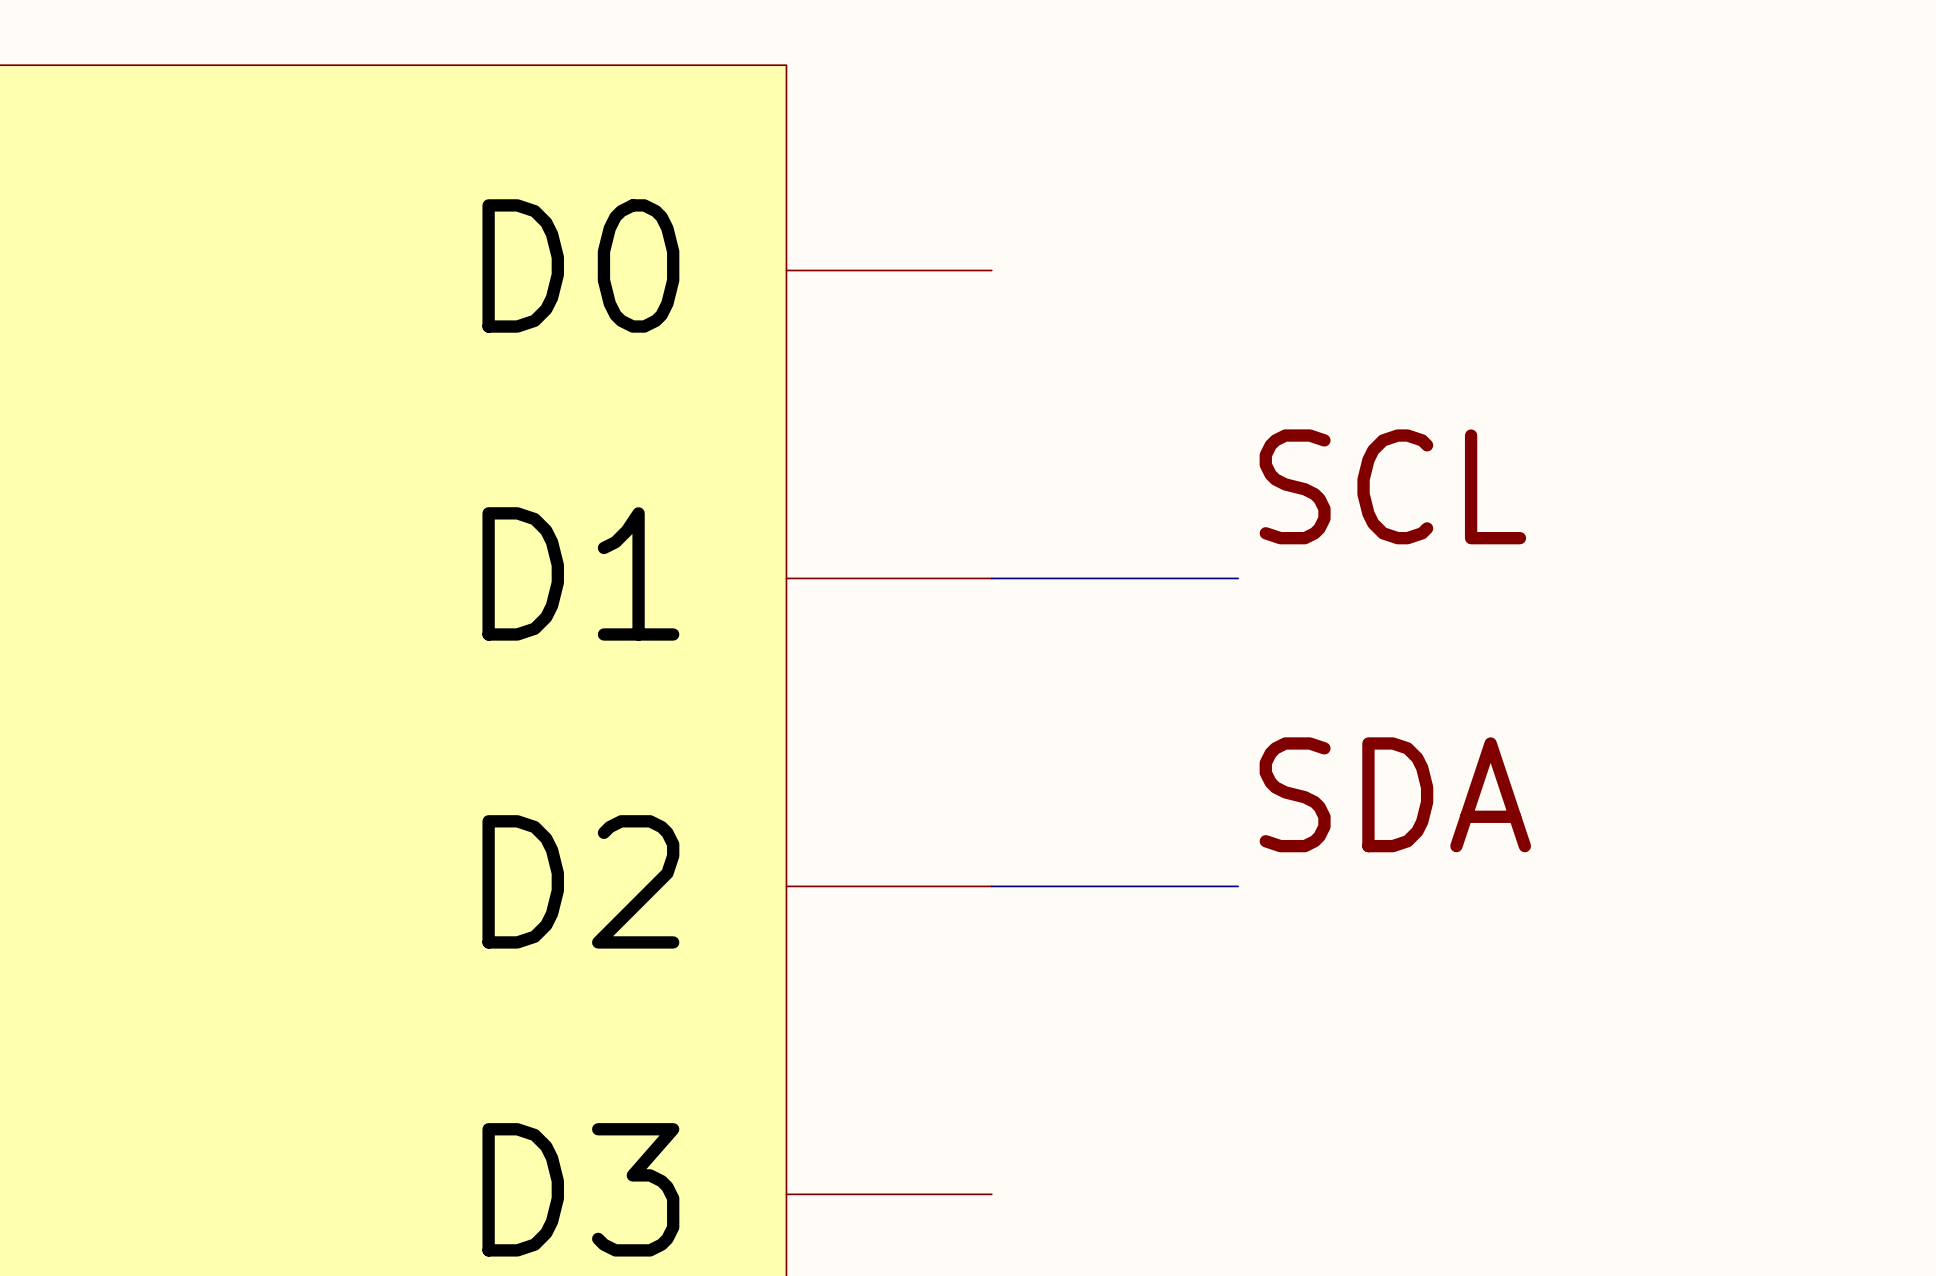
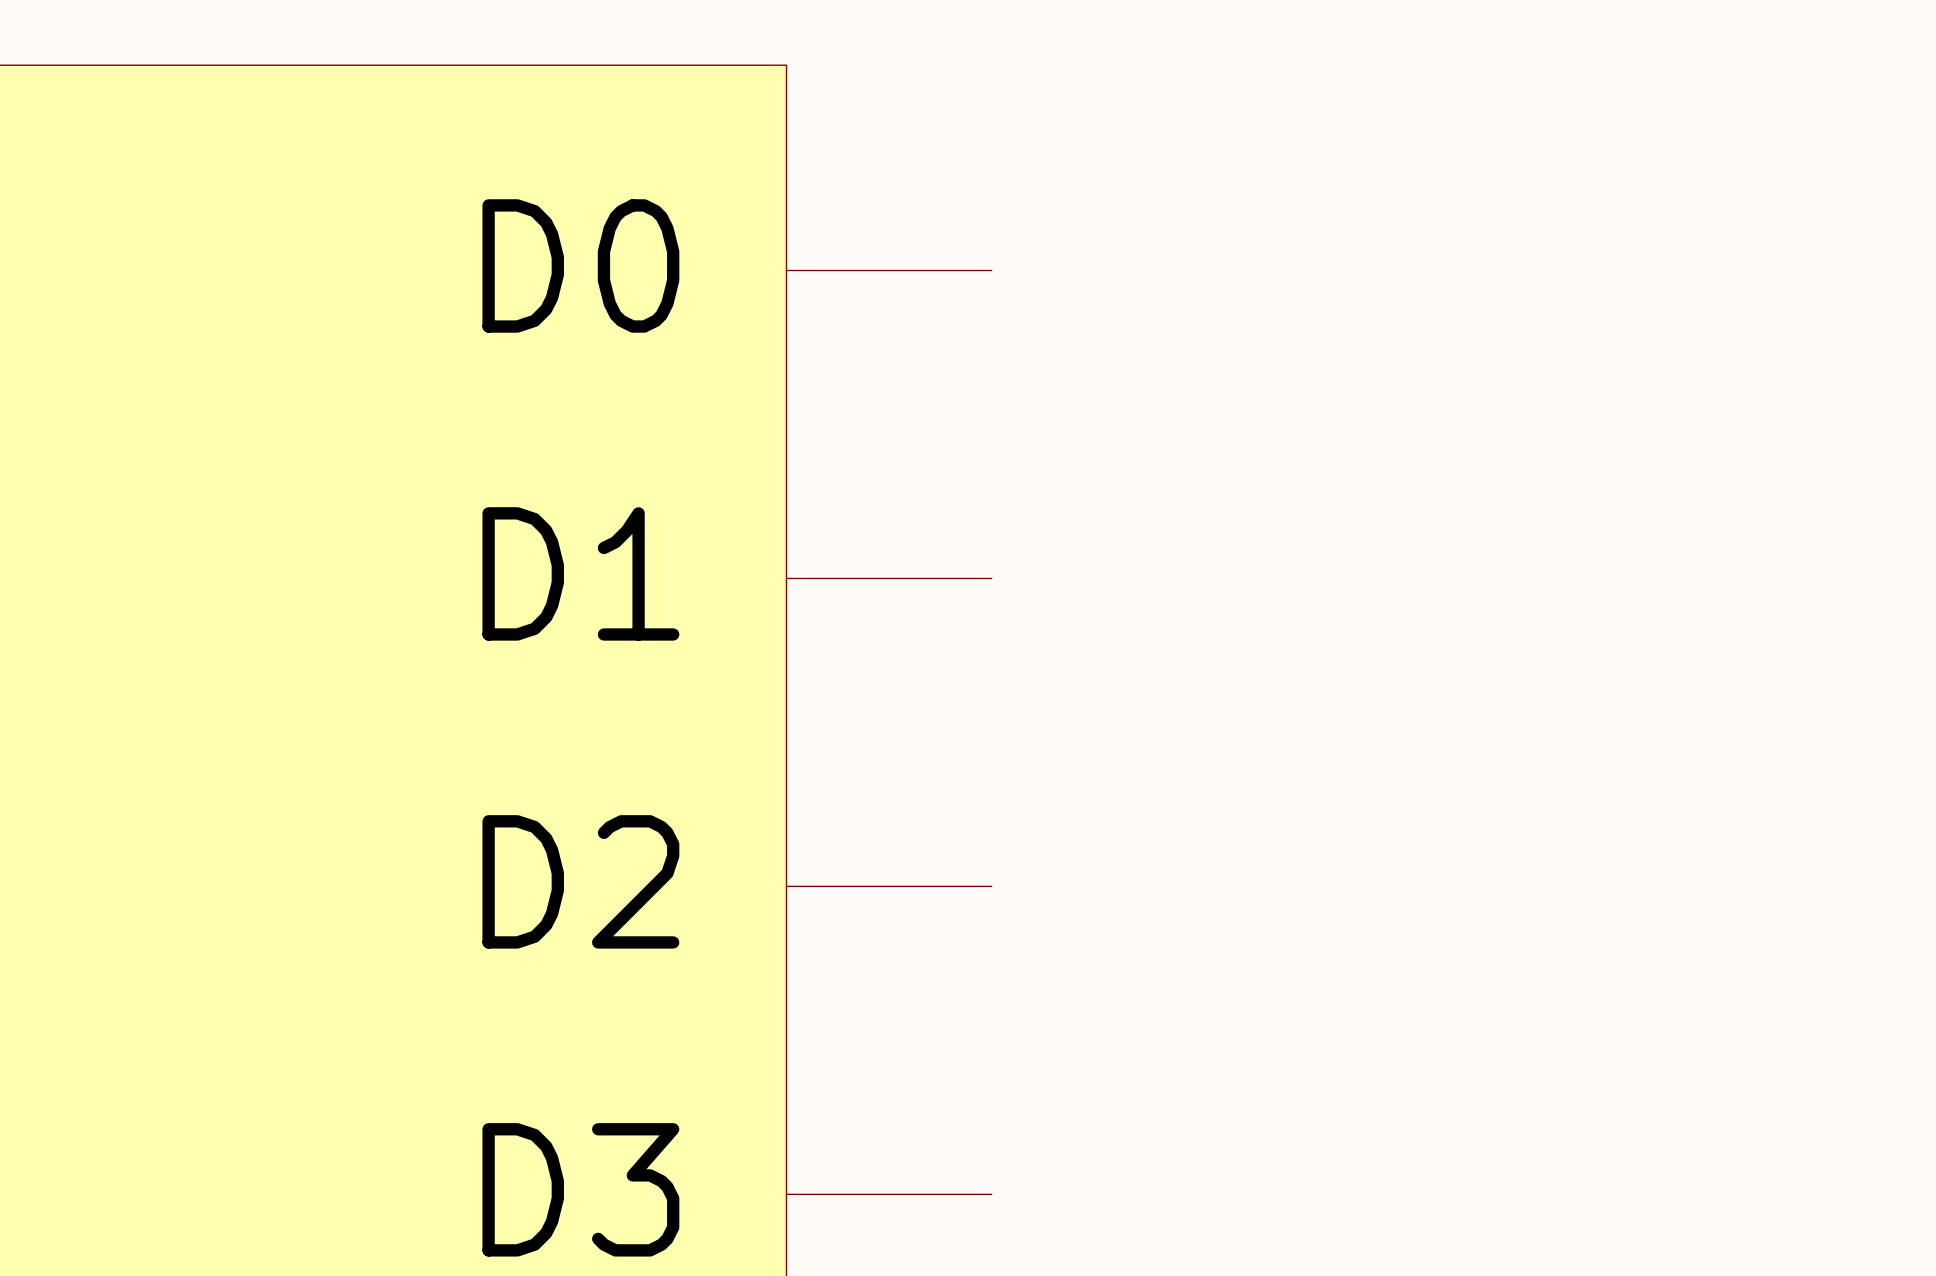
label: SCL (1392, 486) -> none
wire: (991, 578) (1238, 578) -> none
label: SDA (1395, 794) -> none
wire: (991, 886) (1238, 886) -> none

